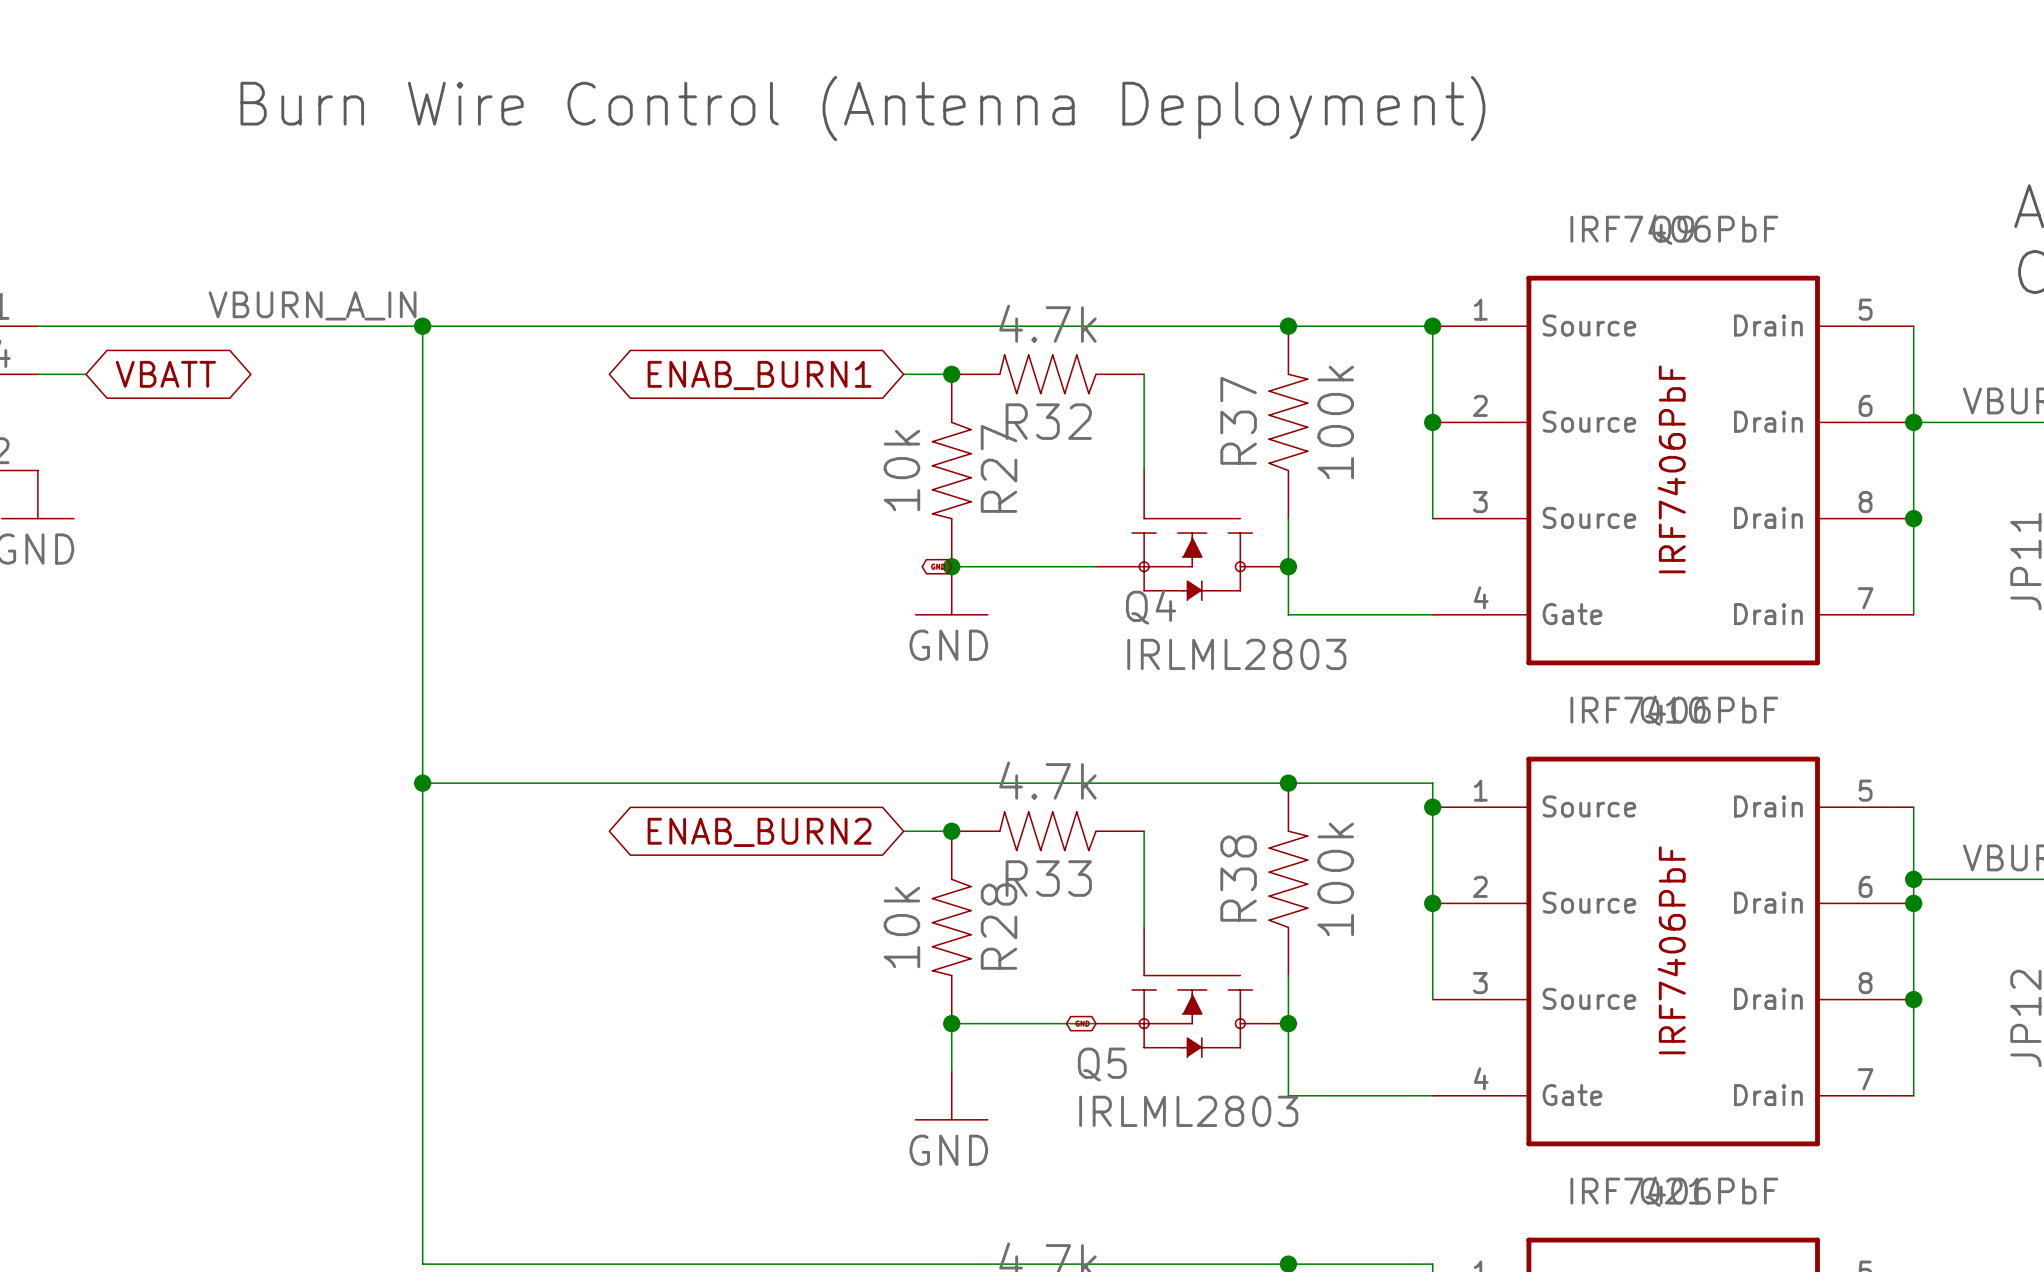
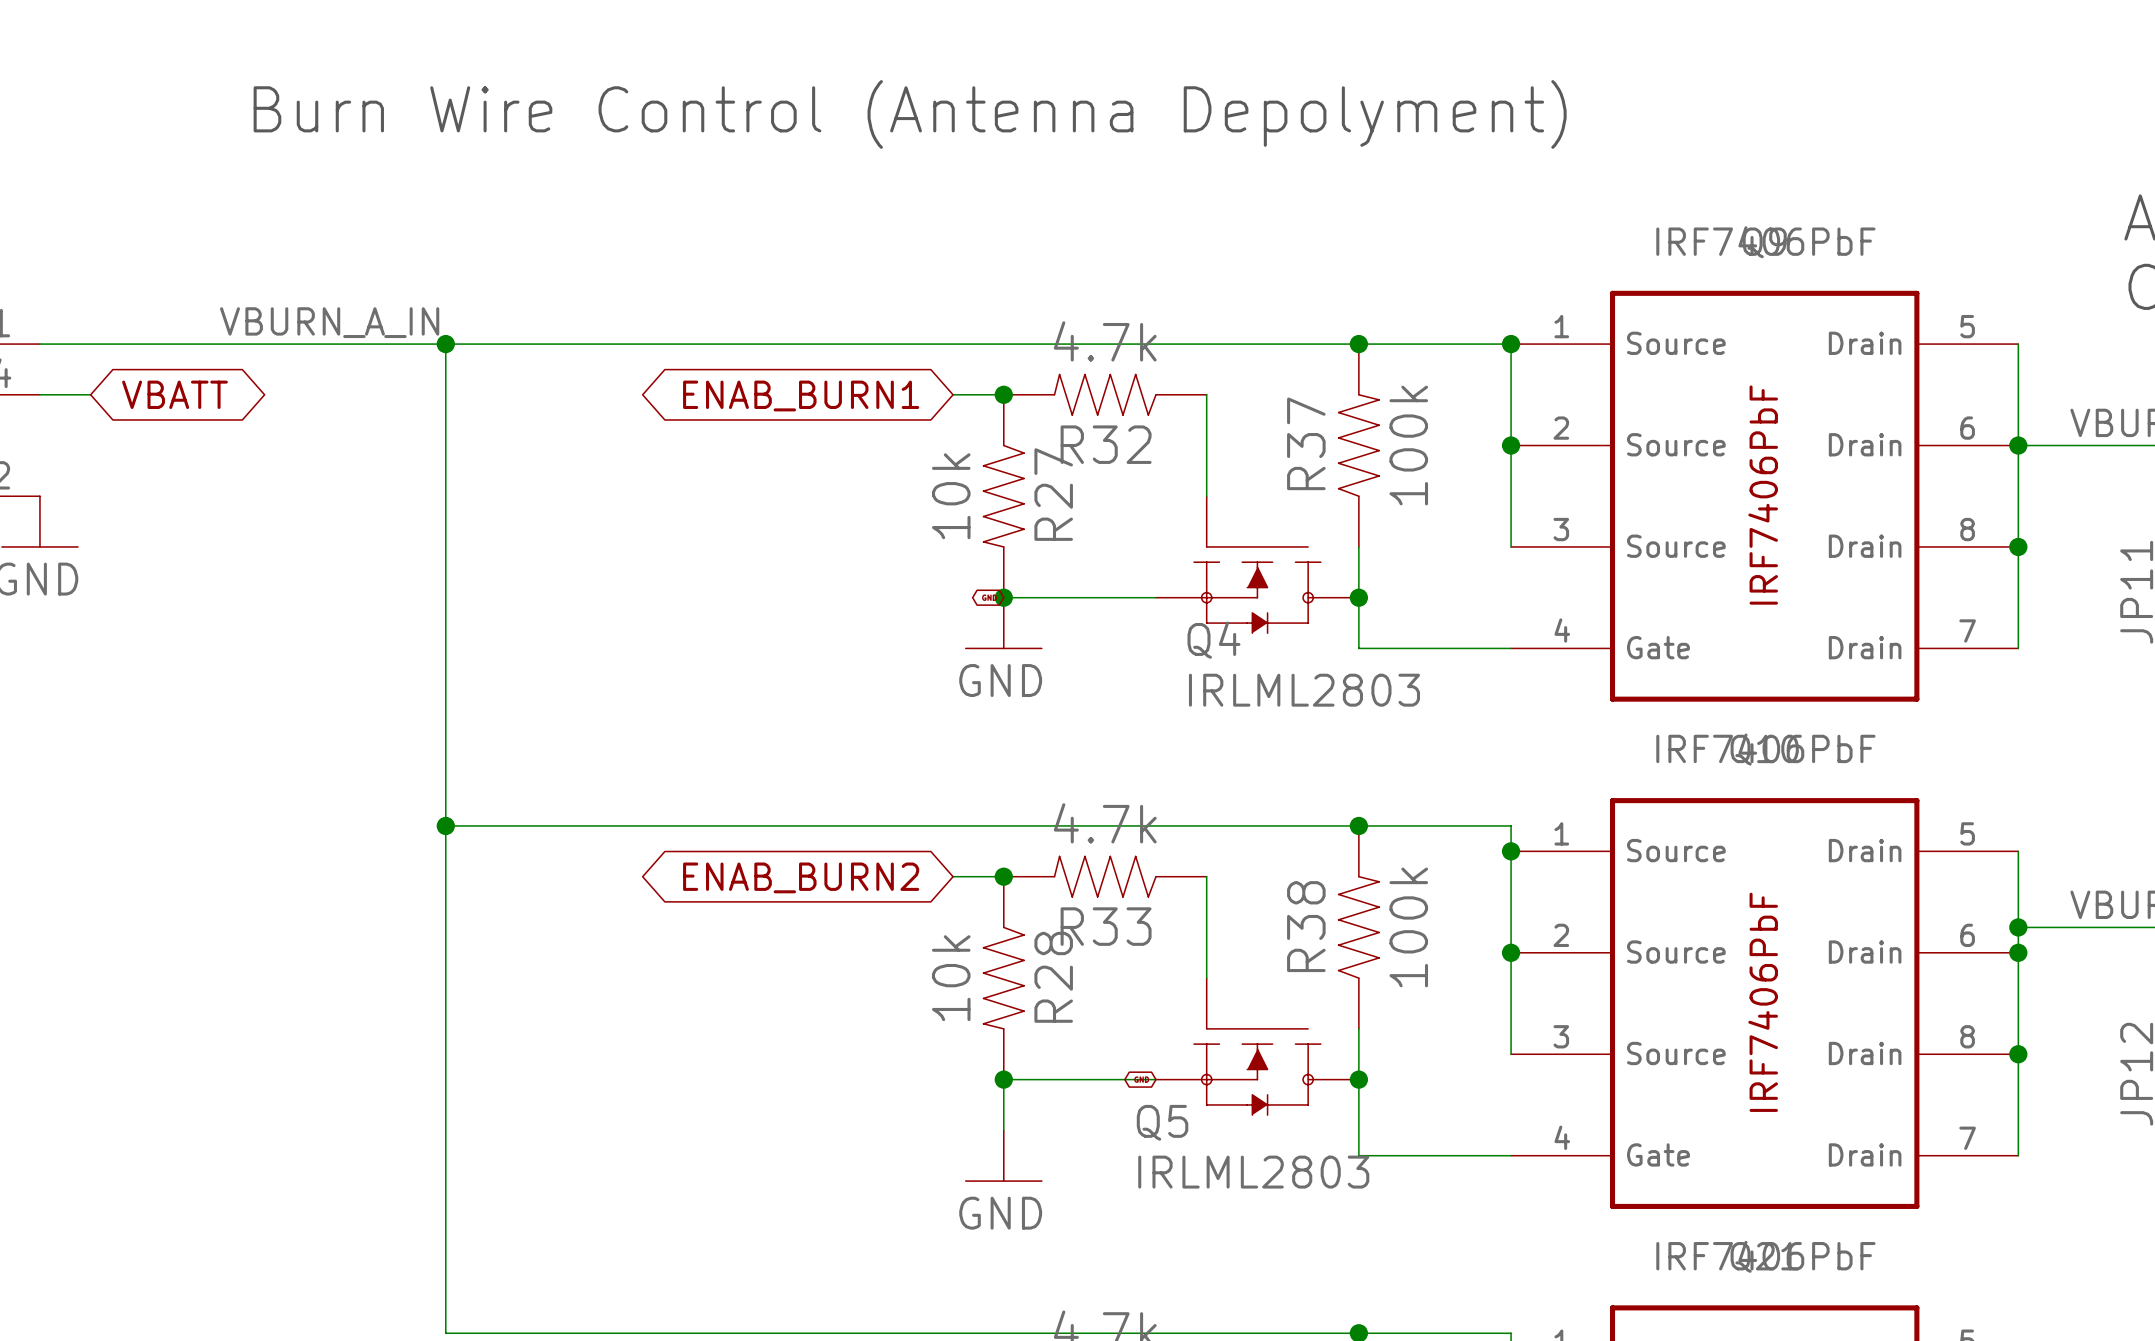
text: Burn Wire Control (Antenna Deployment) (862, 108) -> Burn Wire Control (Antenna Depolyment) (910, 114)

